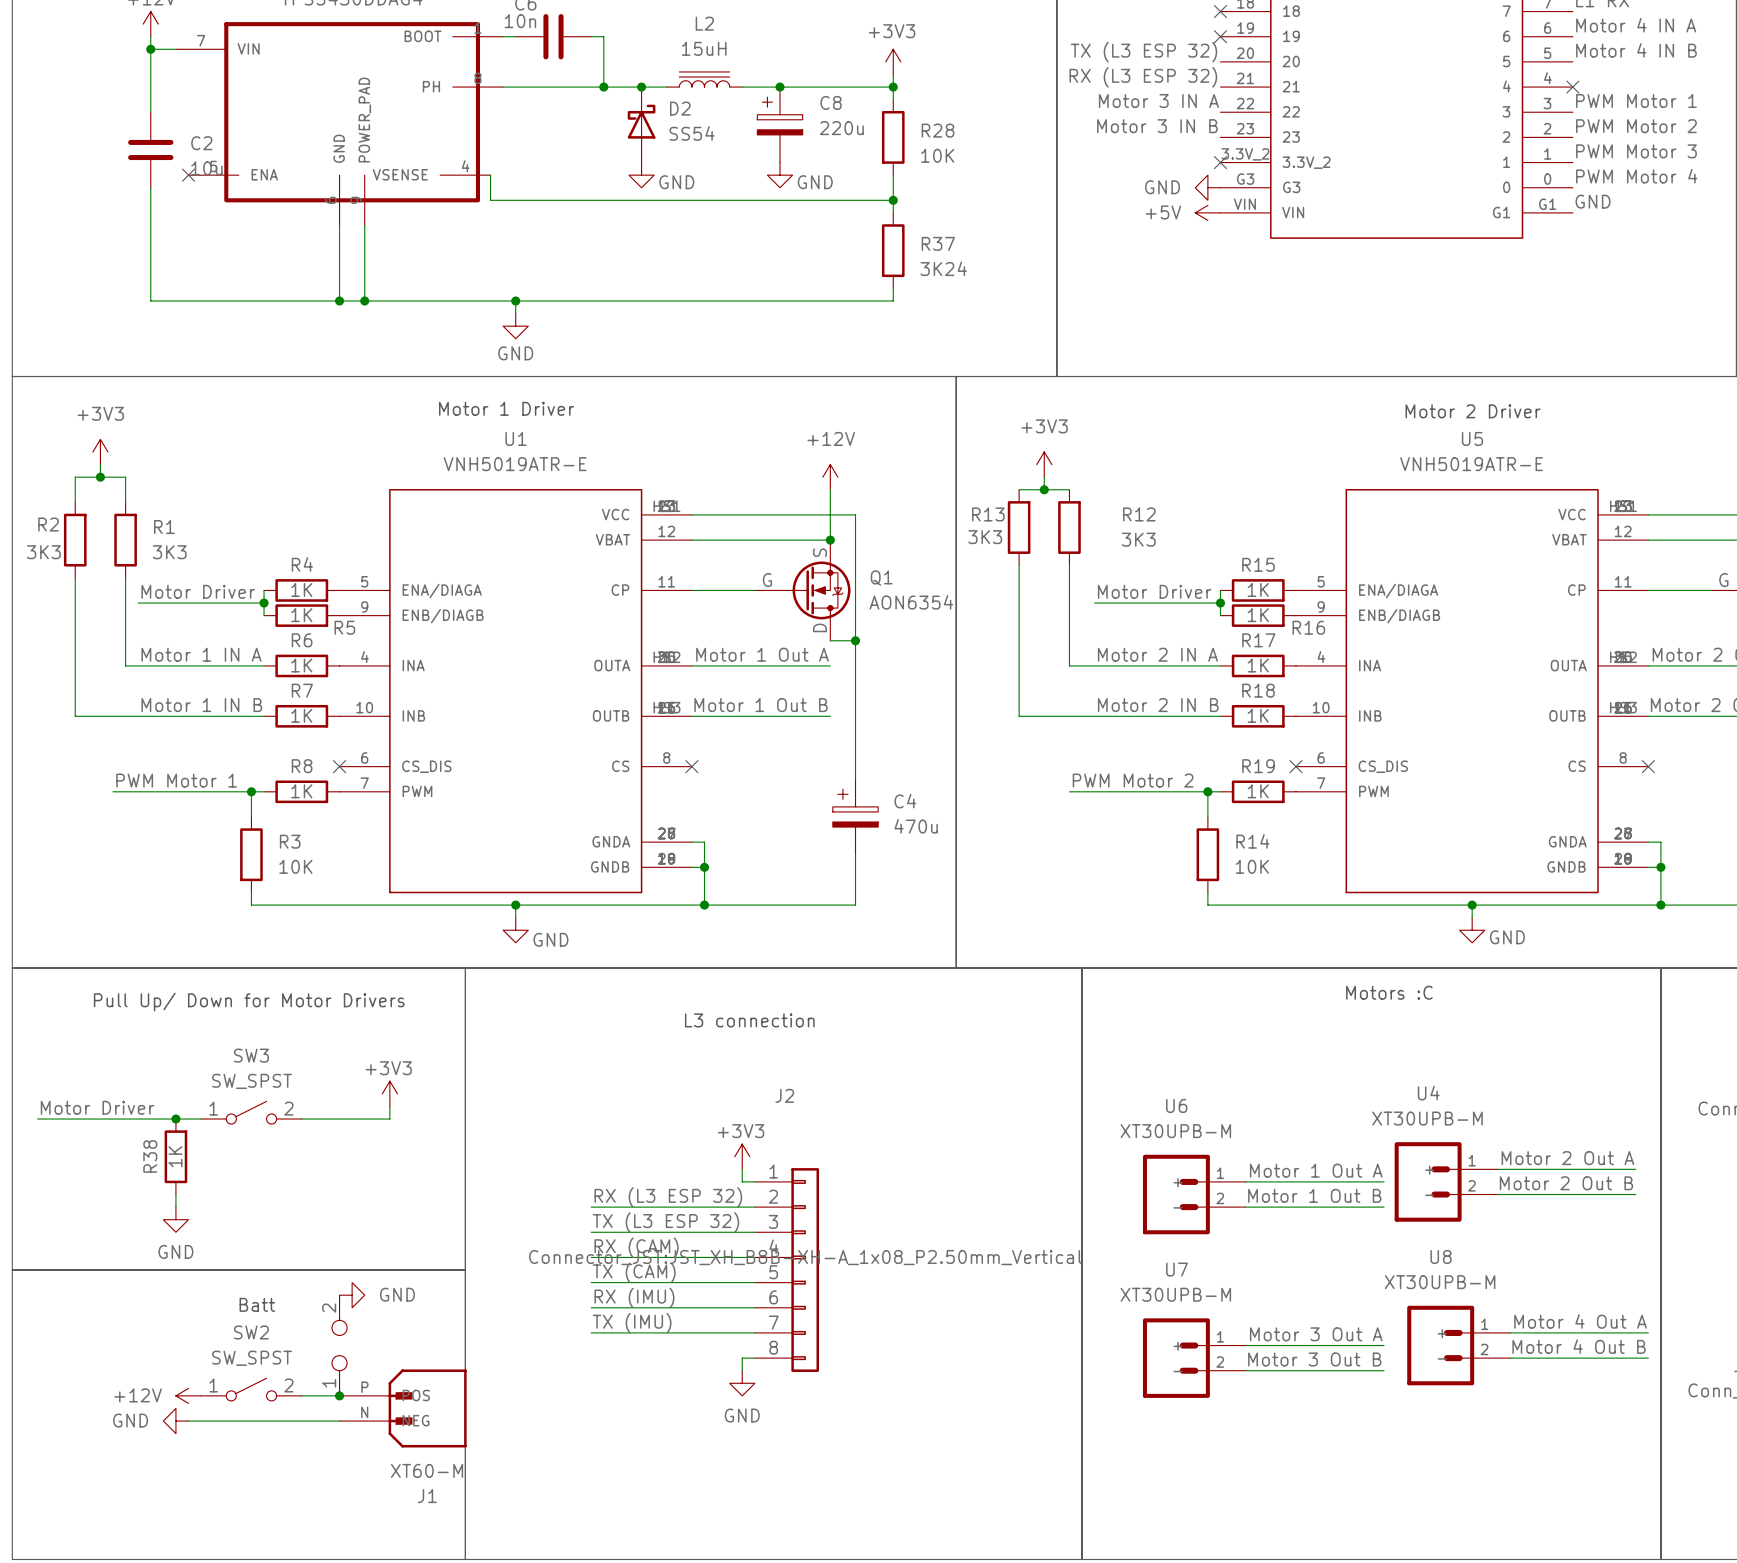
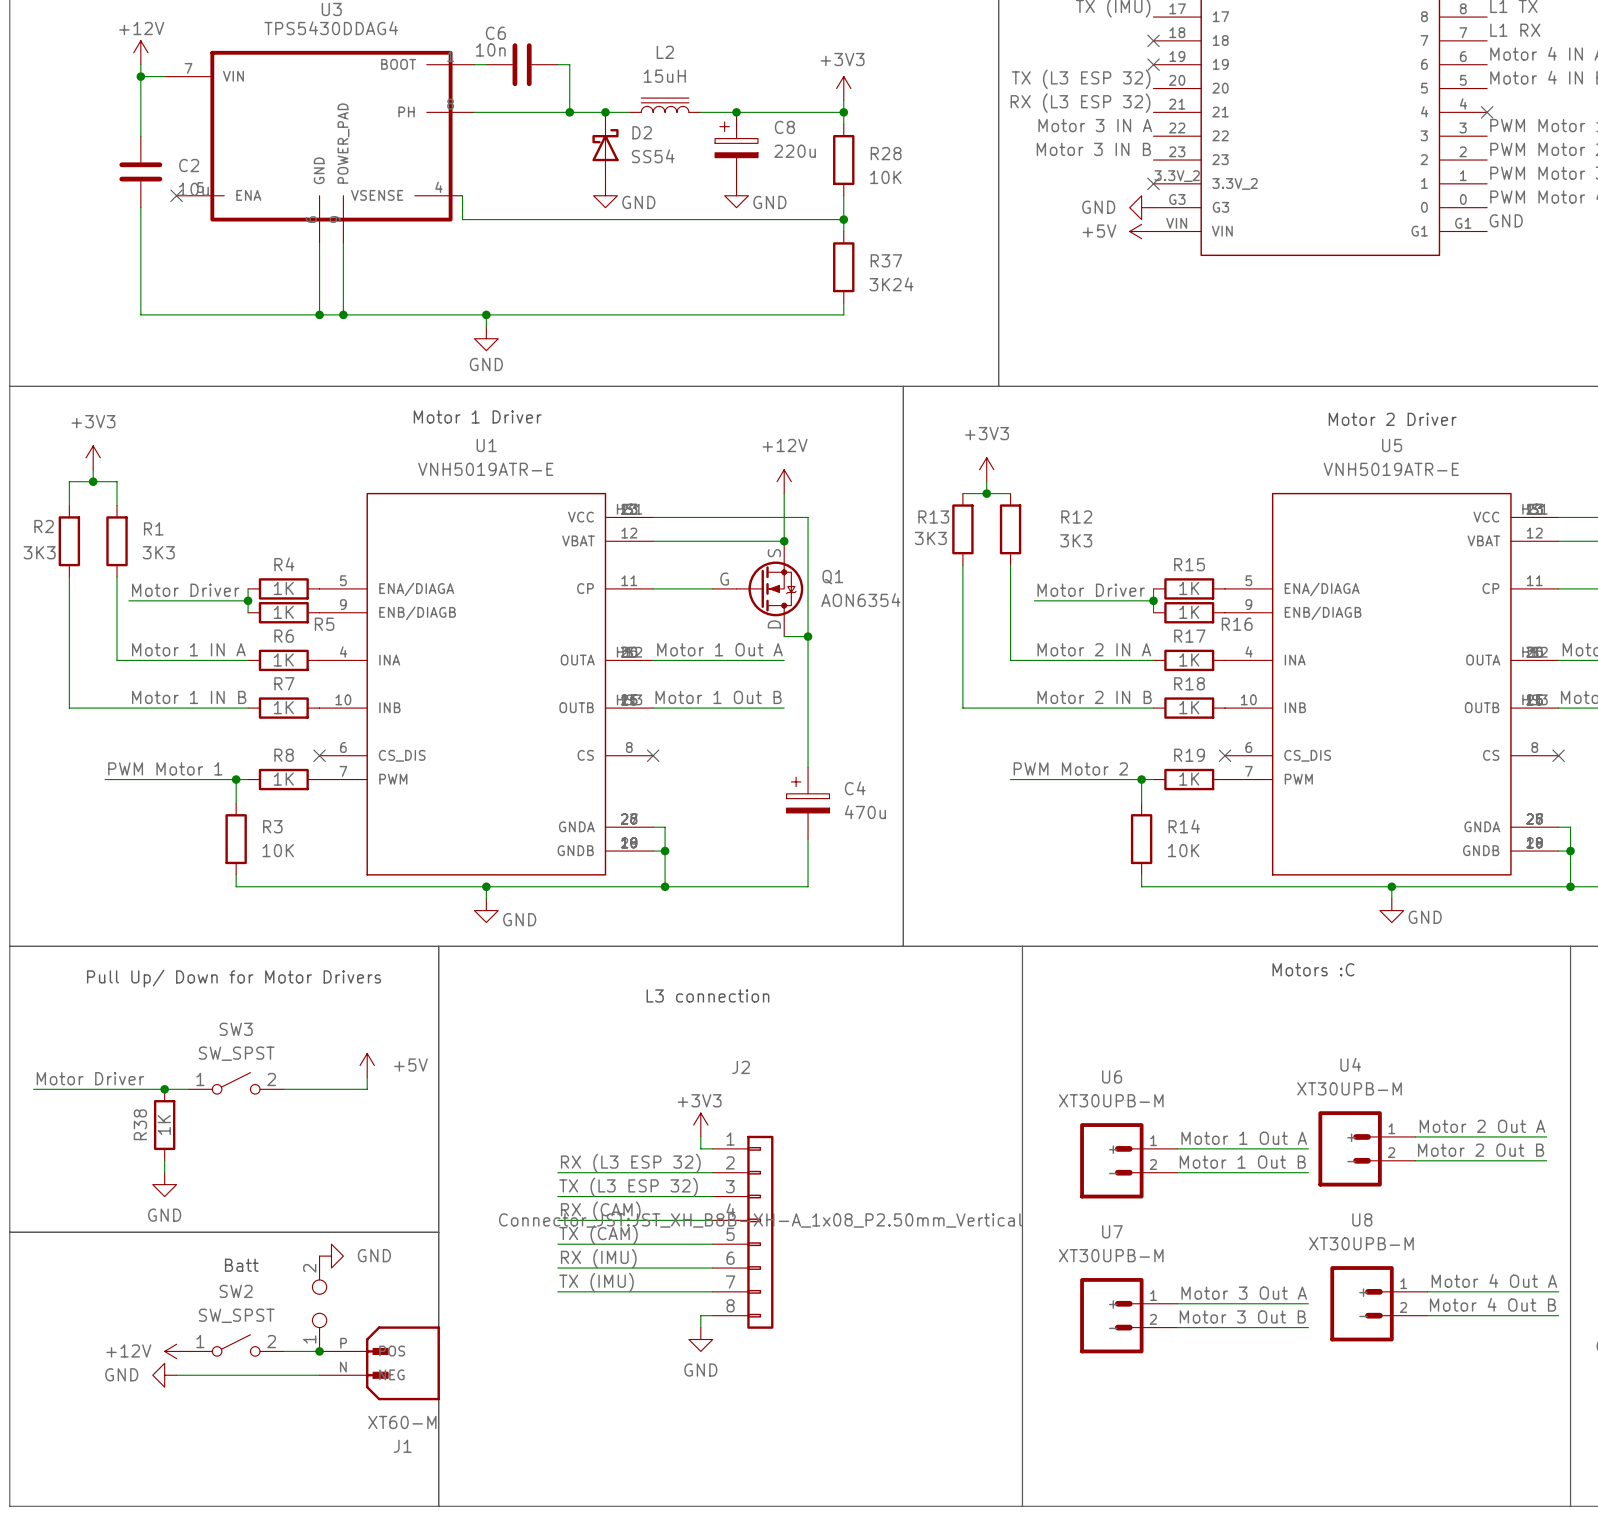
power symbol: +3V3 (389, 1093) -> +5V (367, 1065)

